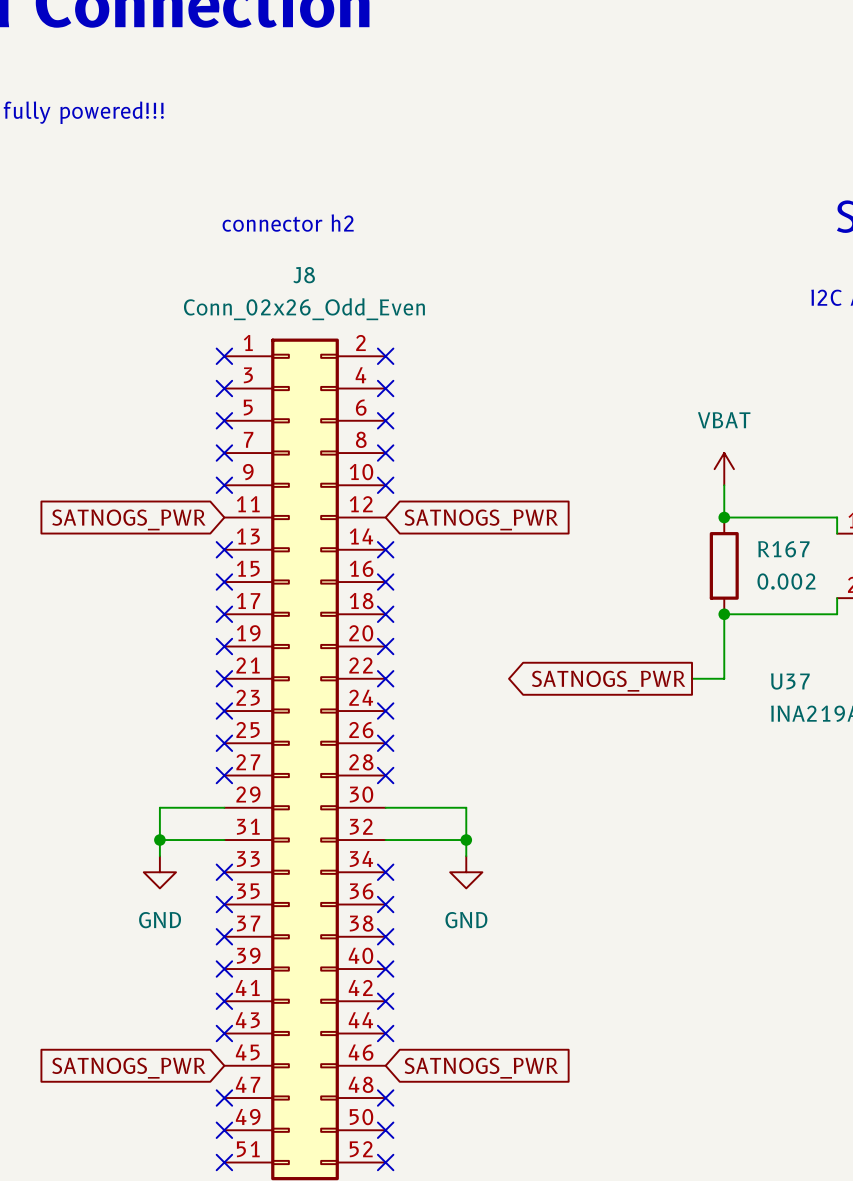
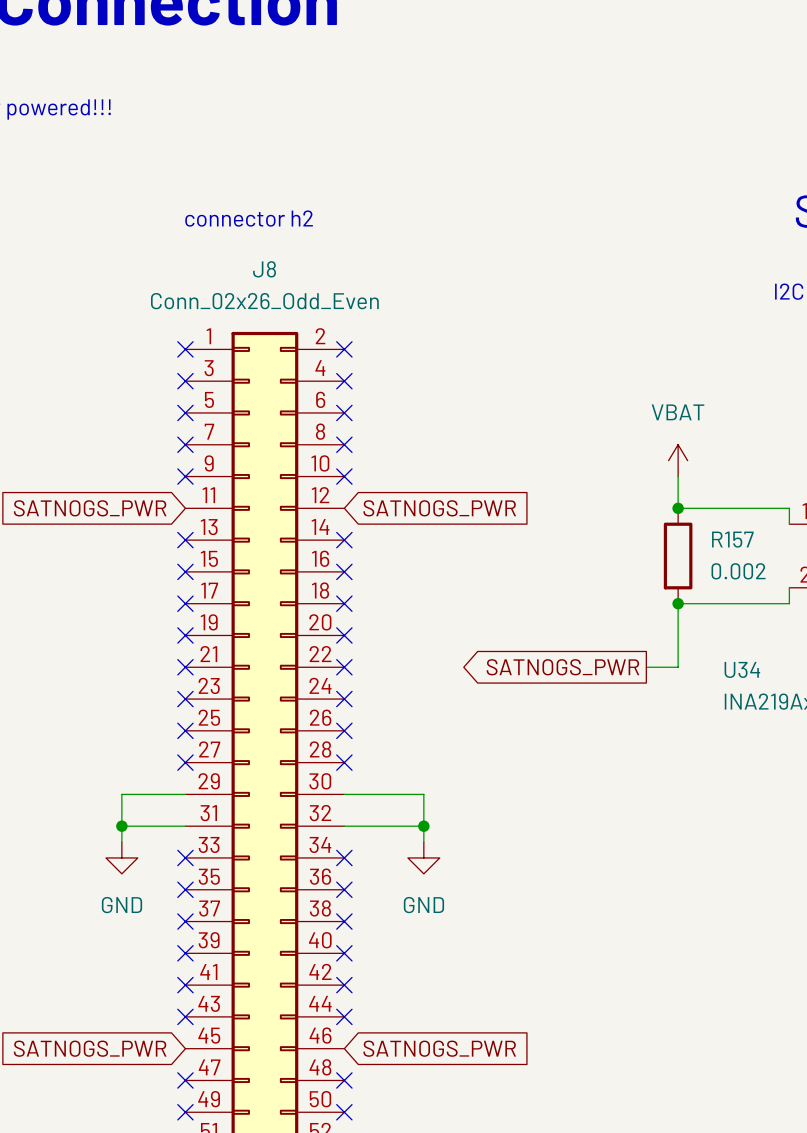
R167 name: R167 (783, 549) -> R157 (732, 539)
U37 name: U37 (790, 681) -> U34 (742, 669)

